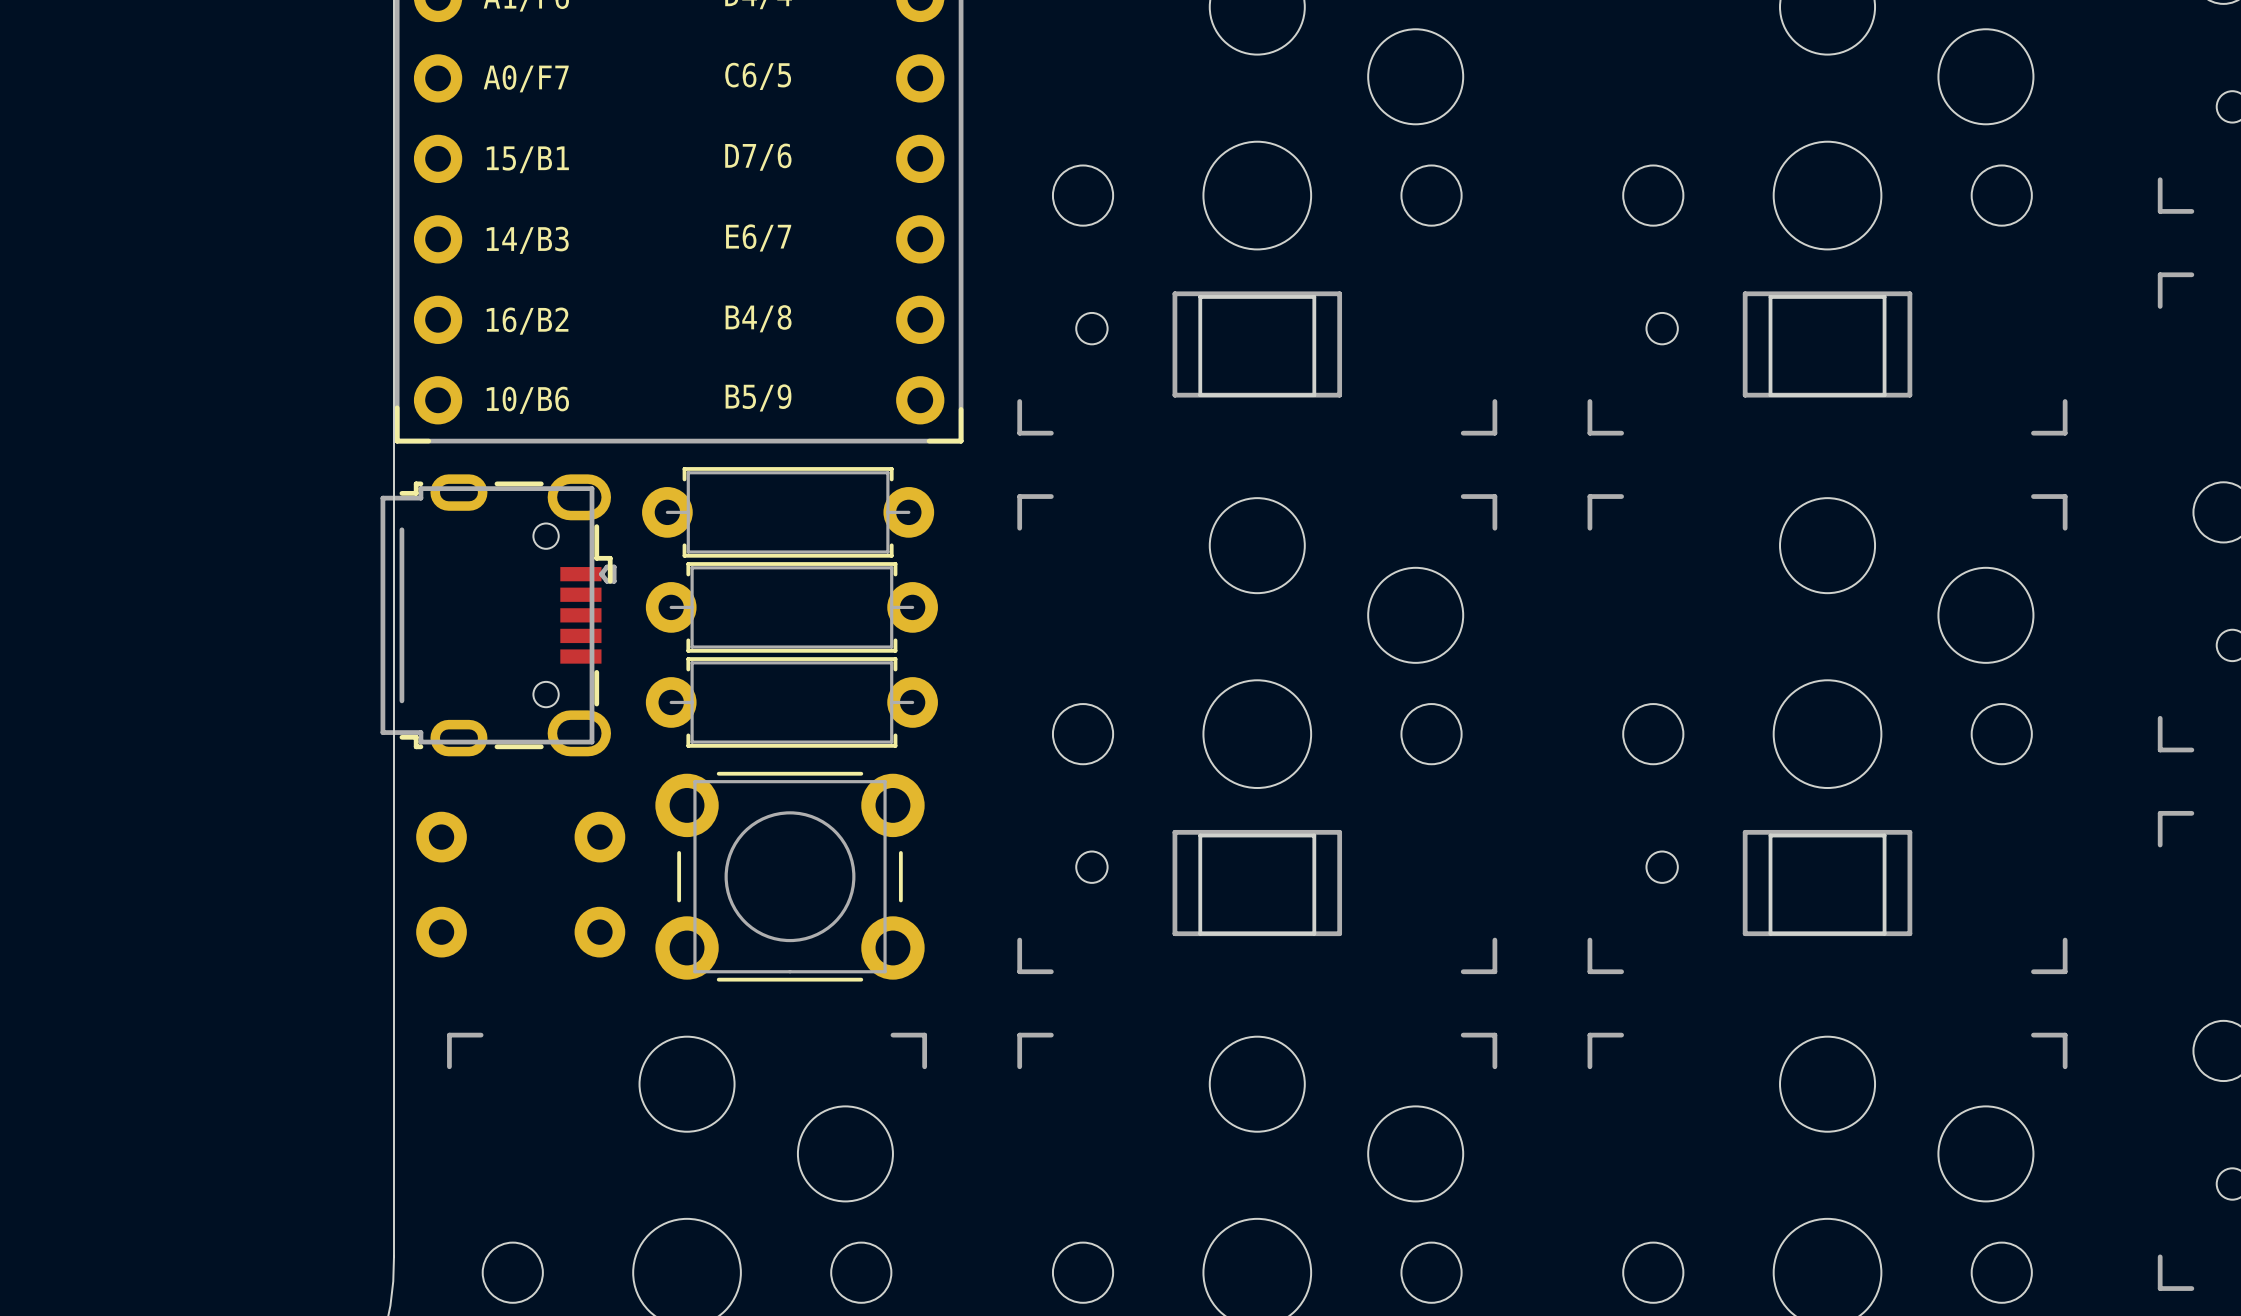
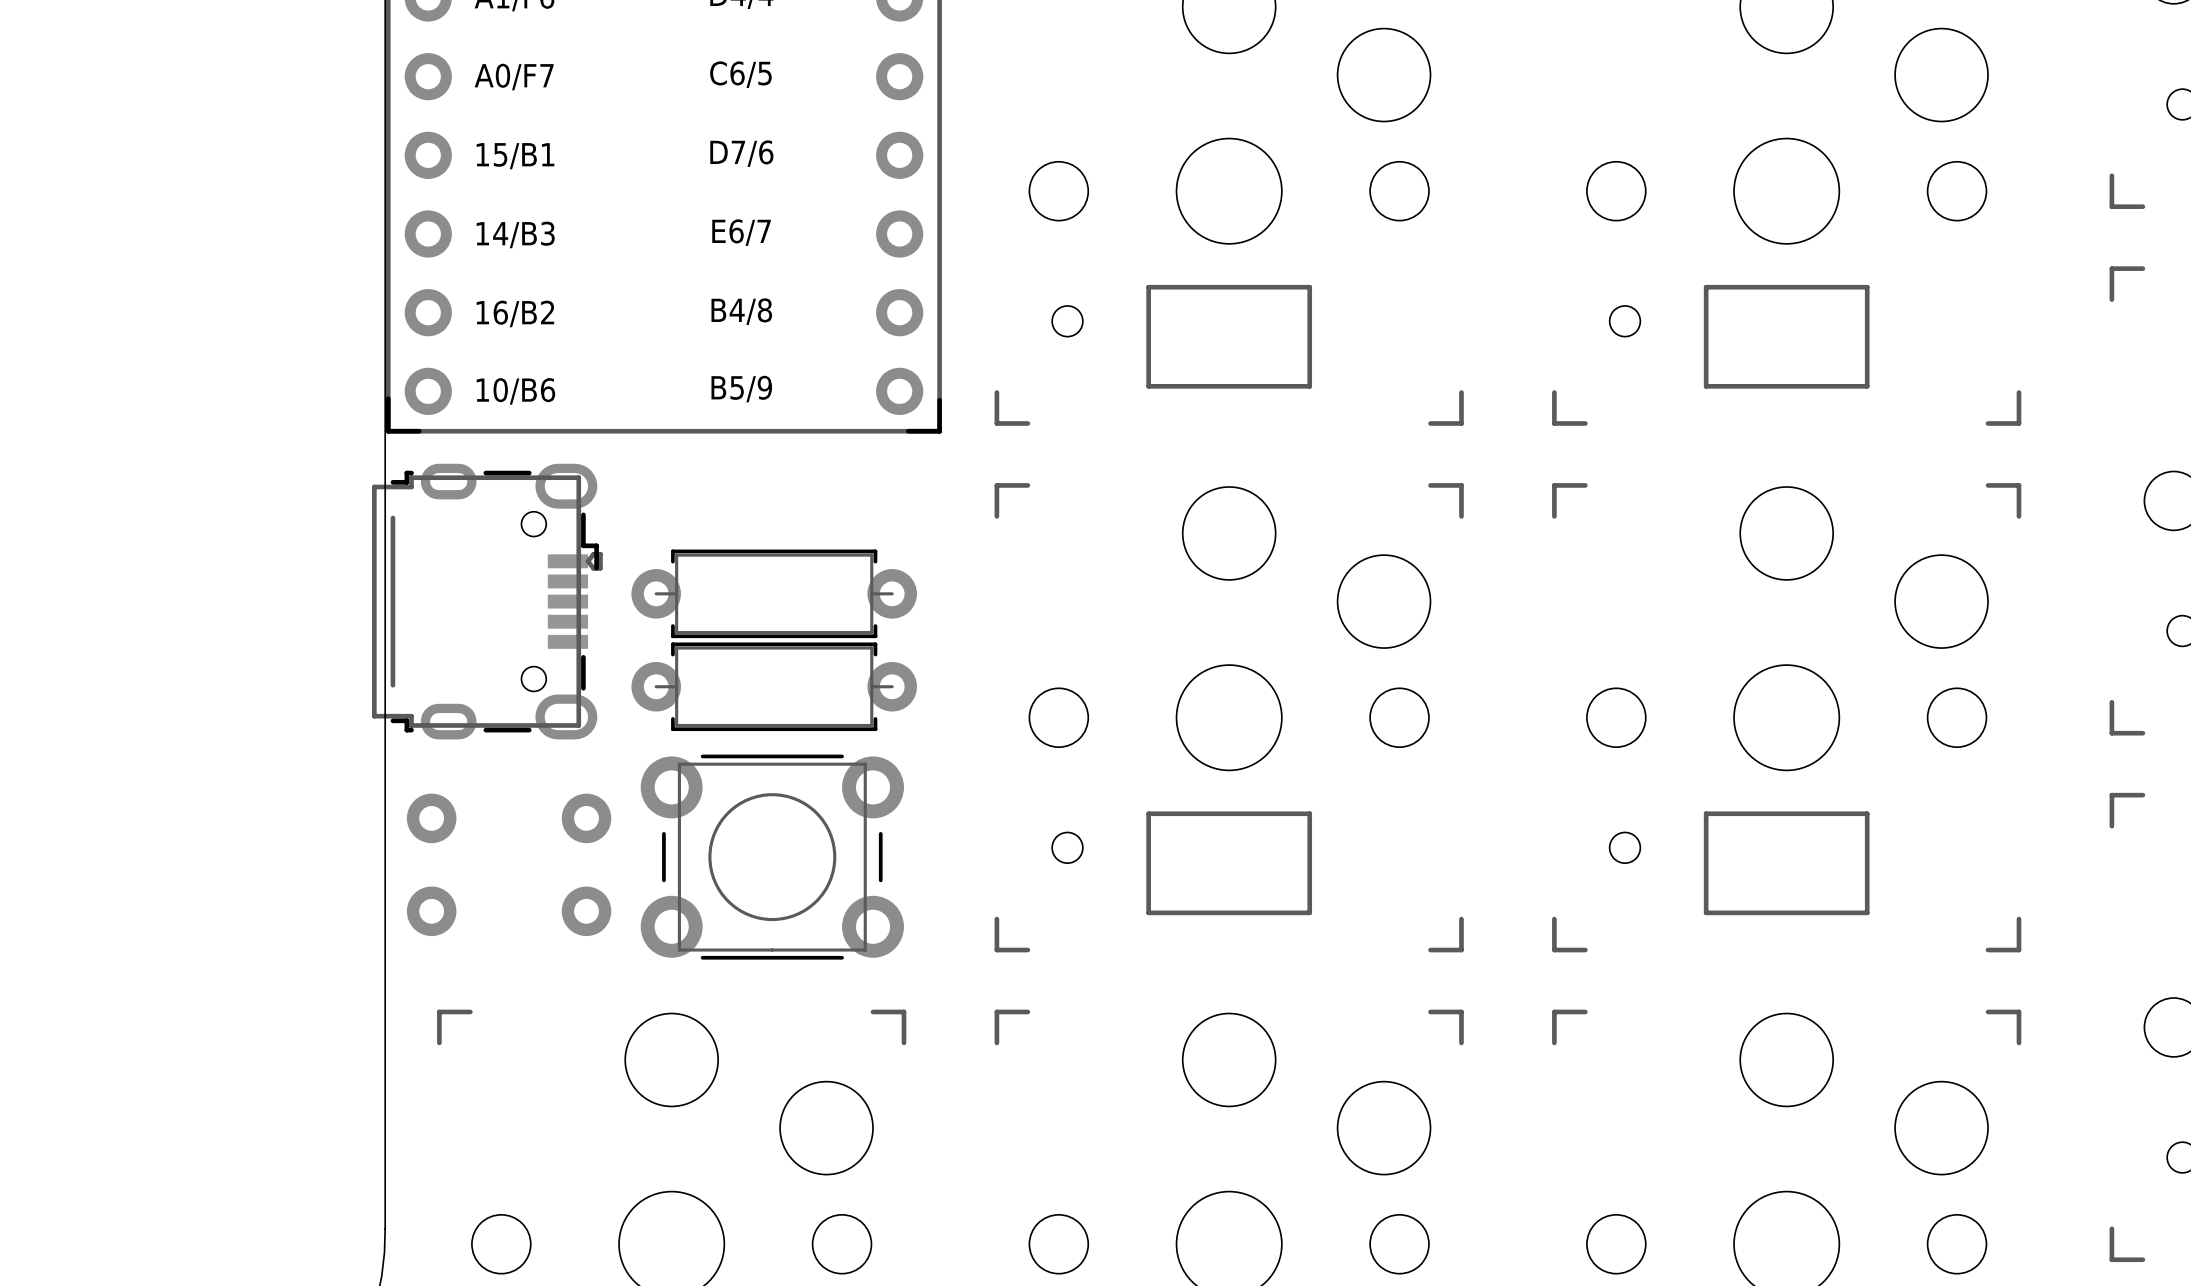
part: (1257, 346) -> none
part: (1827, 346) -> none
part: (788, 512) -> none
part: (1257, 884) -> none
part: (1827, 884) -> none

